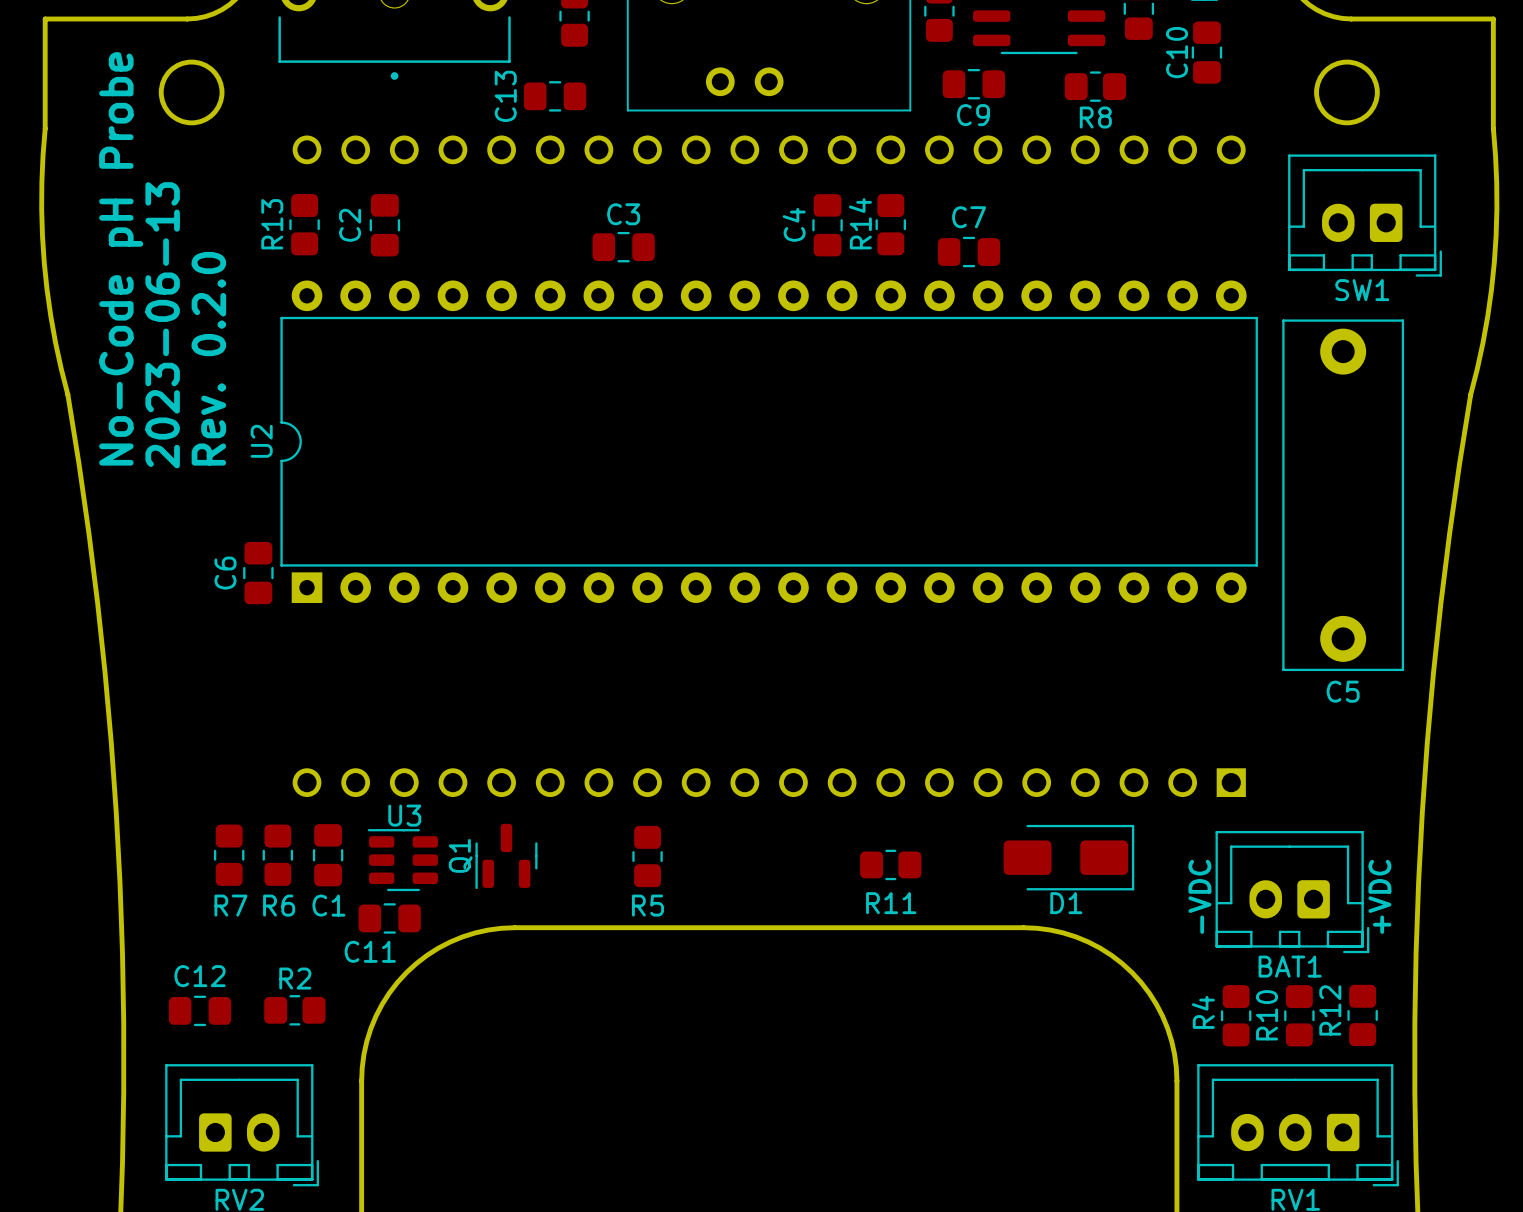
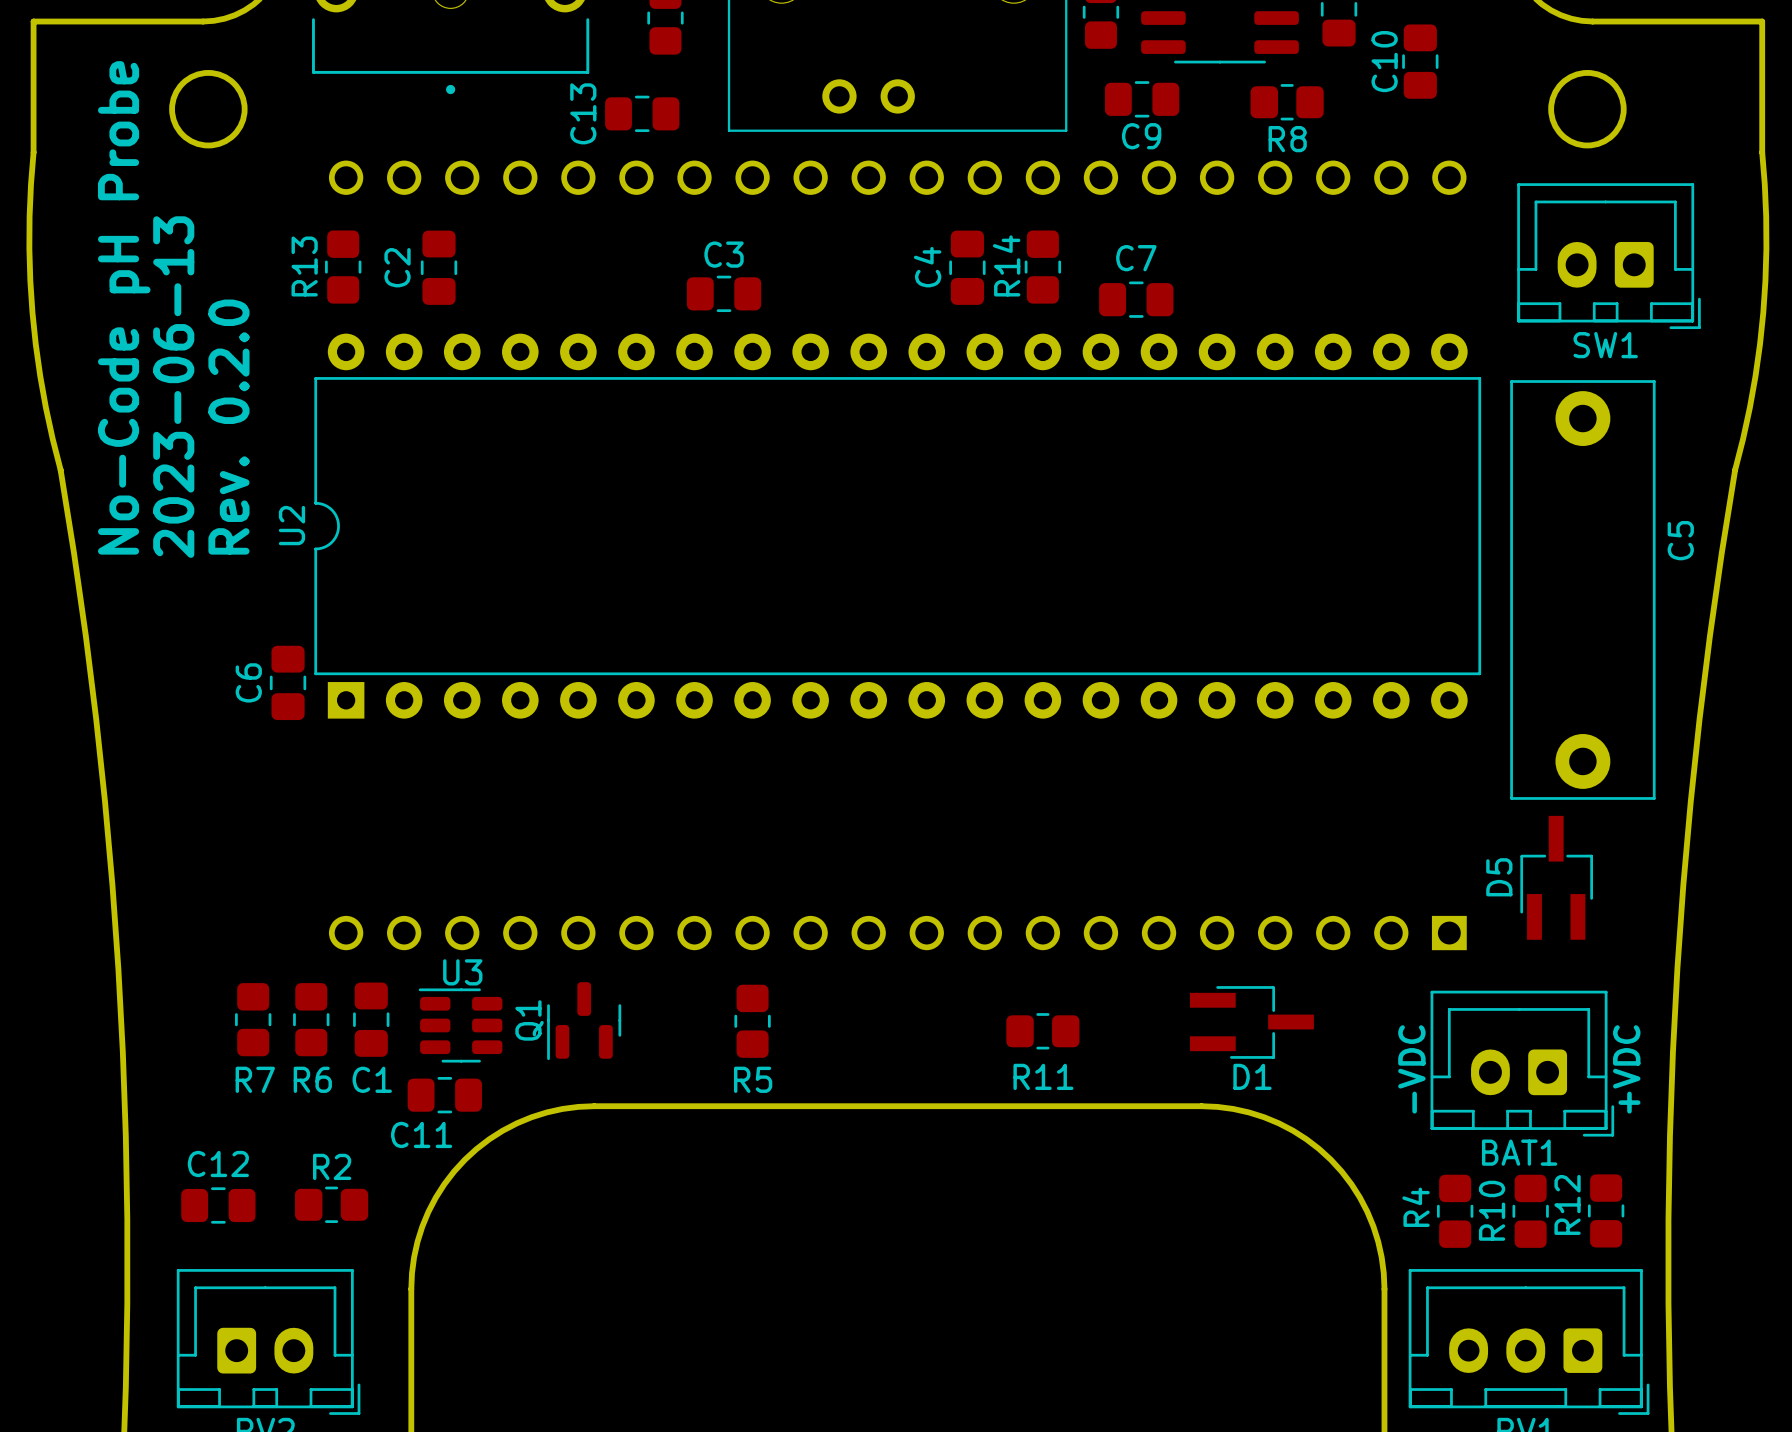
C5 name rotation: 0° (1343, 691) -> 90° counterclockwise (1680, 540)
C5 name position: C5 (1343, 691) -> C5 (1680, 540)
D5: none -> (1556, 877)
D1 footprint: [1003, 824, 1135, 891] -> [1189, 986, 1314, 1059]

